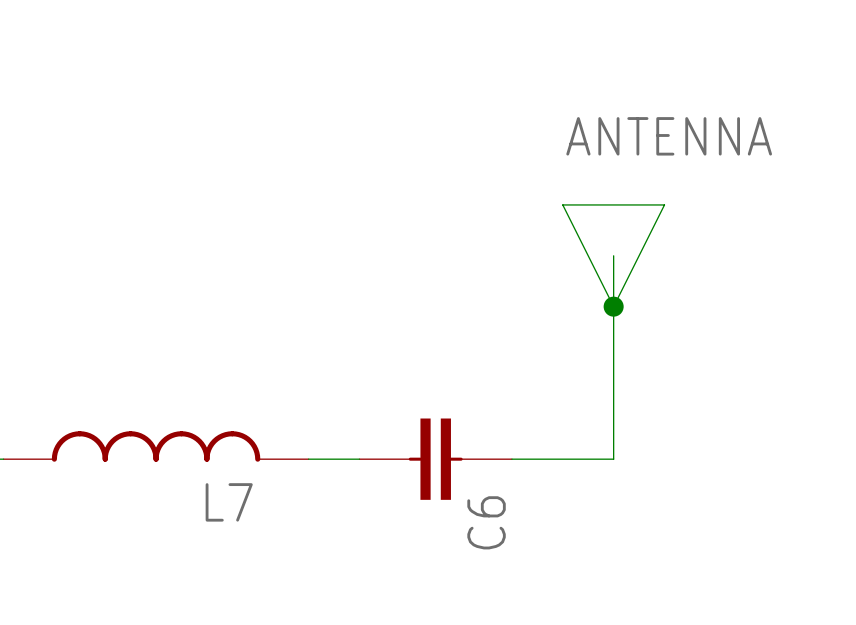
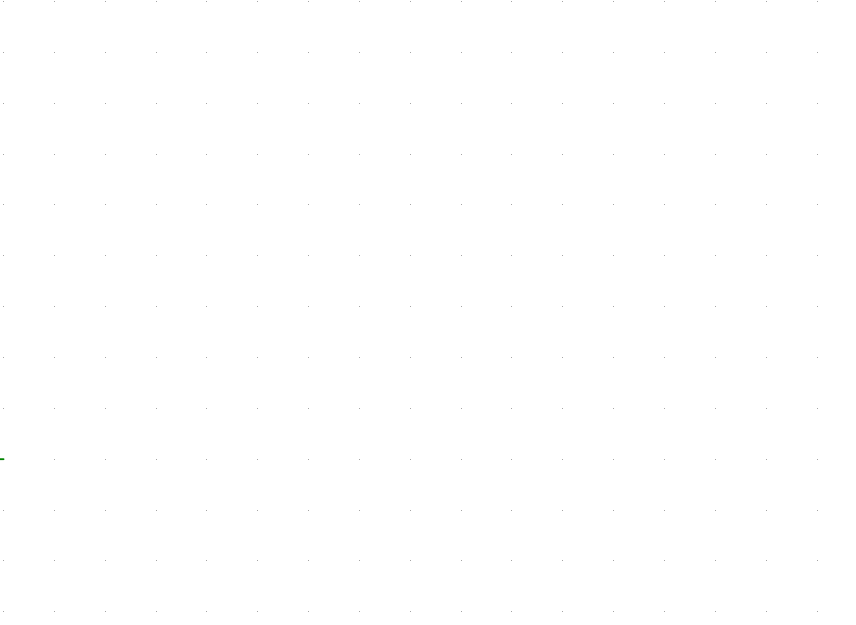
label: ANTENNA (669, 136) -> none
wire: (562, 204) (613, 306) (664, 204) (562, 204) -> none
wire: (613, 255) (613, 459) (511, 459) -> none
junction: (613, 306) -> none
L7: (156, 446) -> none
wire: (308, 459) (359, 459) -> none
C6: (435, 459) -> none

